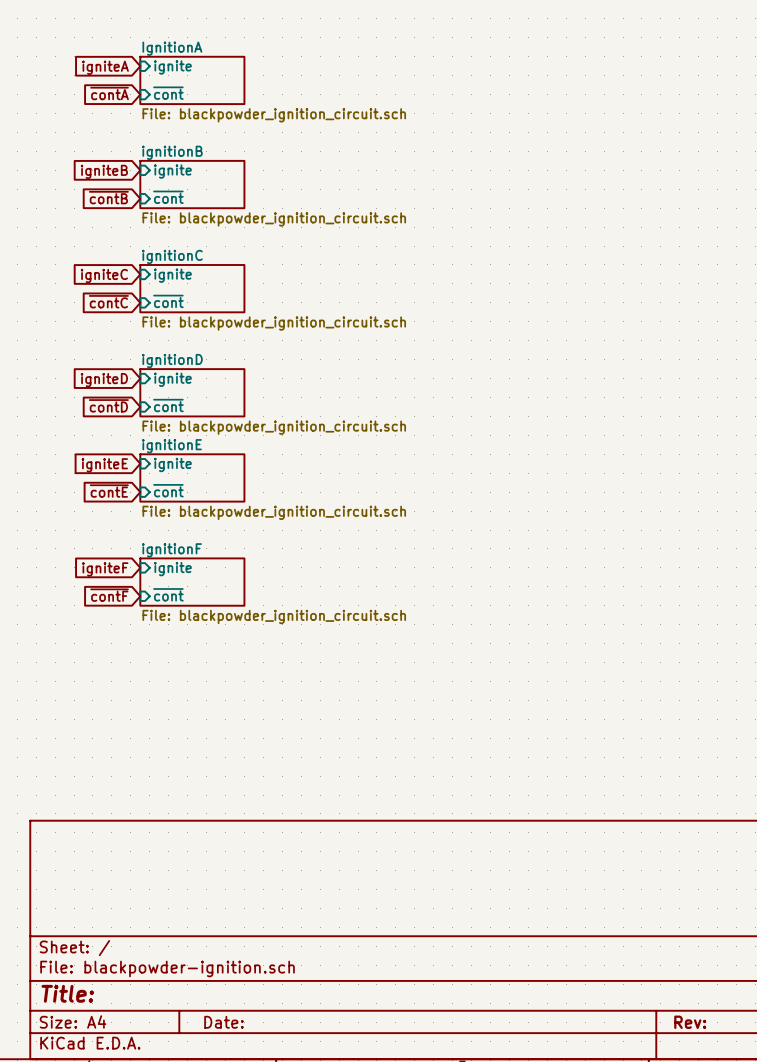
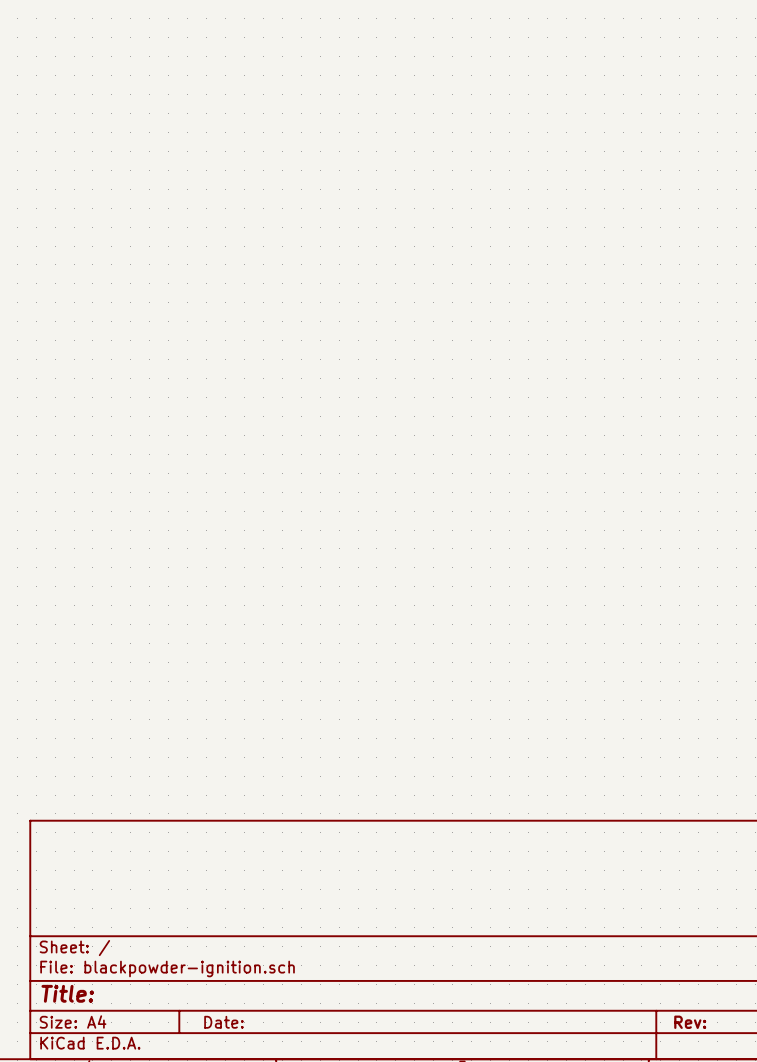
global label: igniteA (105, 67) -> none
sheet pin: ignite (172, 67) -> none
sheet IgnitionA: File: blackpowder_ignition_circuit.sch (192, 80) -> none
global label: ~{contA} (109, 93) -> none
sheet pin: ~{cont} (168, 93) -> none
global label: igniteB (104, 171) -> none
sheet pin: ignite (172, 171) -> none
sheet ignitionB: File: blackpowder_ignition_circuit.sch (192, 184) -> none
global label: ~{contB} (108, 197) -> none
sheet pin: ~{cont} (168, 197) -> none
sheet pin: ignite (172, 275) -> none
global label: igniteC (104, 276) -> none
sheet ignitionC: File: blackpowder_ignition_circuit.sch (192, 288) -> none
global label: ~{contC} (108, 301) -> none
sheet pin: ~{cont} (168, 301) -> none
sheet pin: ignite (172, 379) -> none
global label: igniteD (104, 380) -> none
sheet ignitionD: File: blackpowder_ignition_circuit.sch (192, 392) -> none
global label: ~{contD} (108, 405) -> none
sheet pin: ~{cont} (168, 405) -> none
sheet pin: ignite (172, 464) -> none
global label: igniteE (104, 465) -> none
sheet ignitionE: File: blackpowder_ignition_circuit.sch (192, 477) -> none
sheet pin: ~{cont} (168, 490) -> none
global label: ~{contE} (109, 491) -> none
global label: igniteF (105, 569) -> none
sheet pin: ignite (172, 569) -> none
sheet ignitionF: File: blackpowder_ignition_circuit.sch (192, 582) -> none
sheet pin: ~{cont} (168, 594) -> none
global label: ~{contF} (109, 595) -> none

